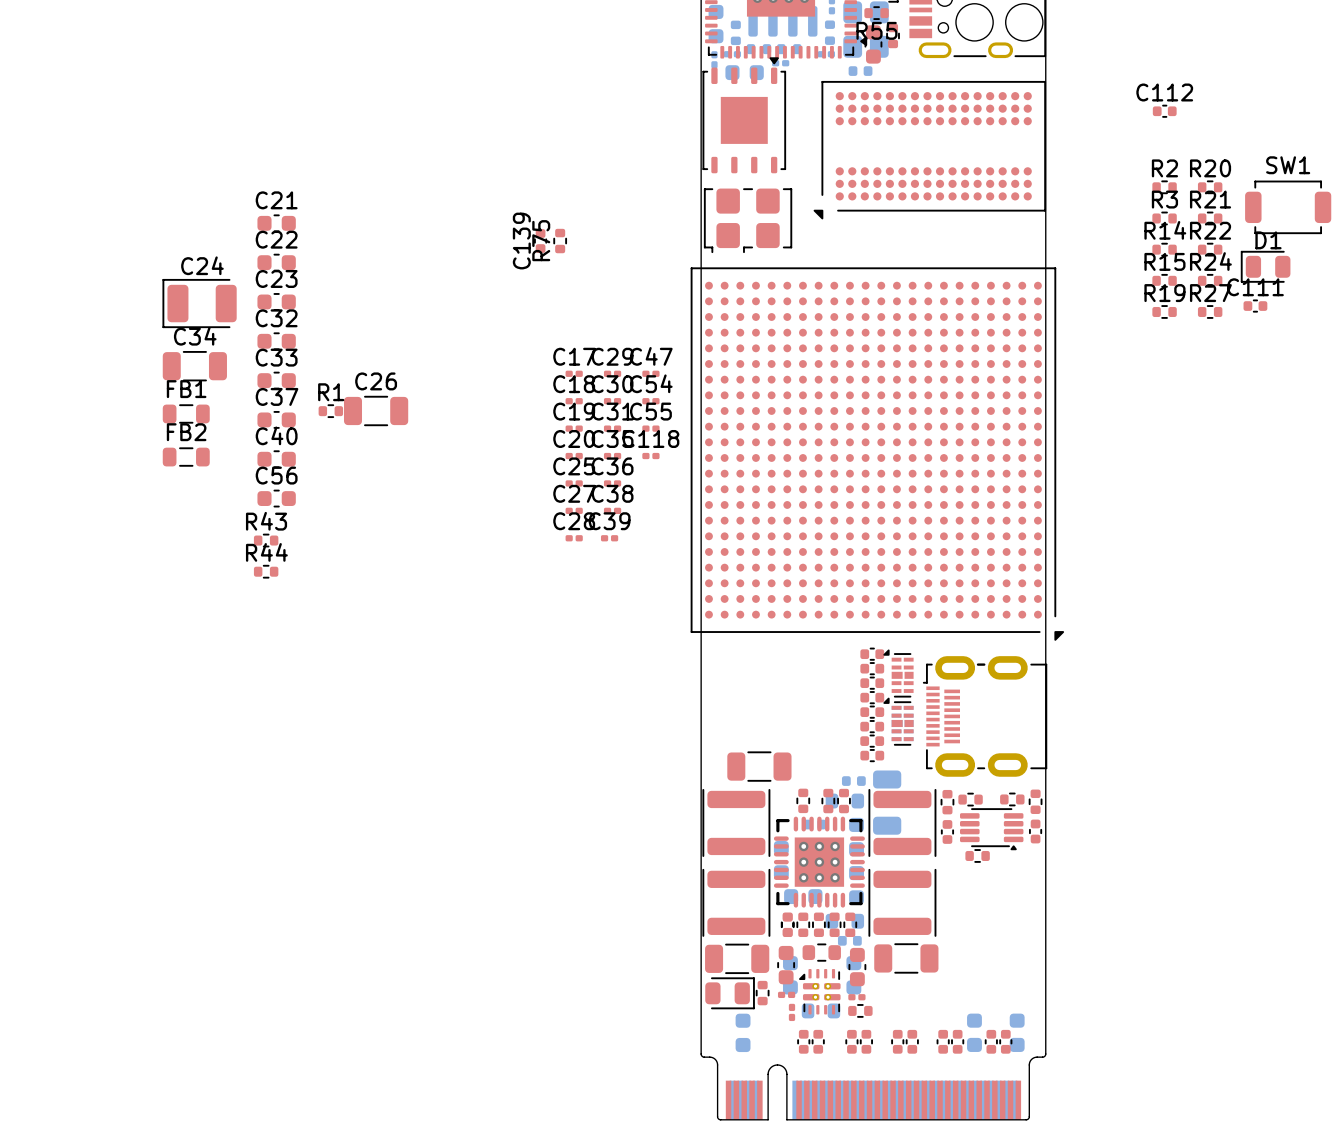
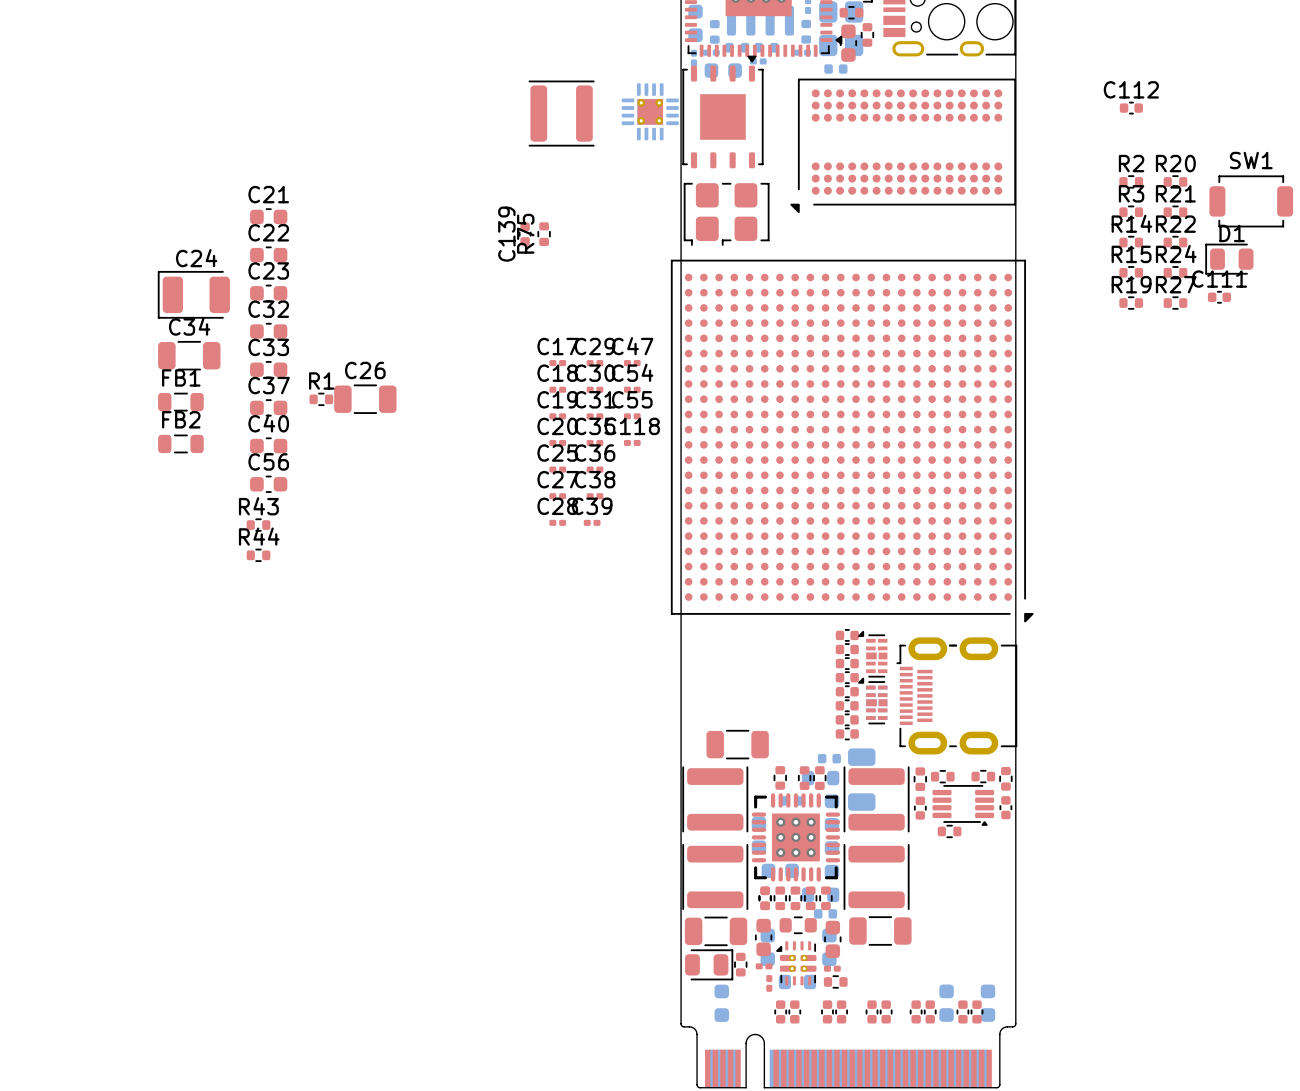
R55 name: R55 (876, 30) -> none
part: none -> (650, 111)
part: none -> (561, 113)

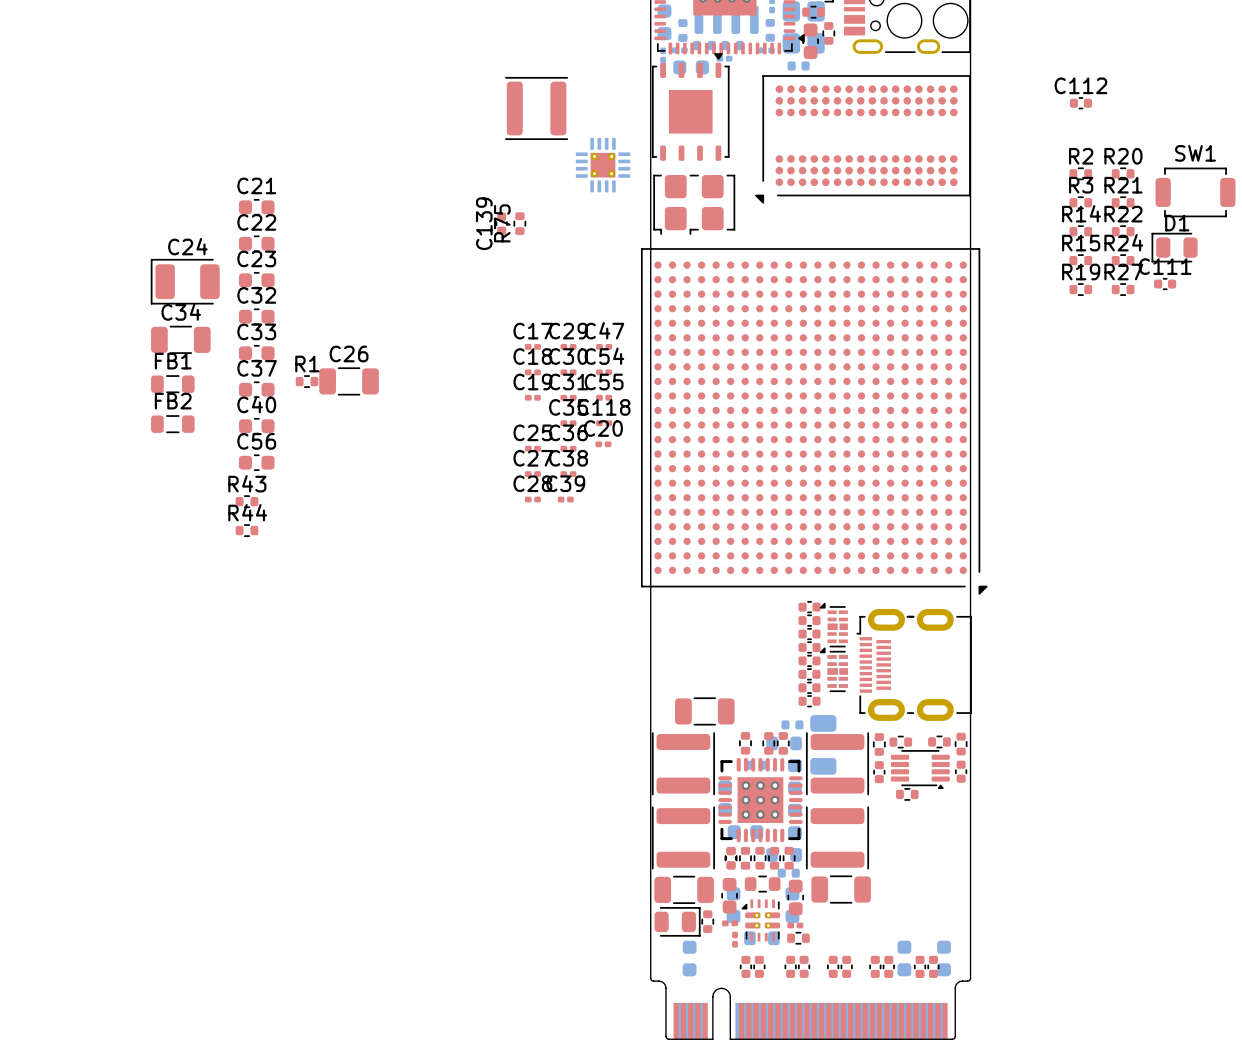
part position: (650, 111) -> (603, 165)
C20 position: (557, 442) -> (603, 444)

